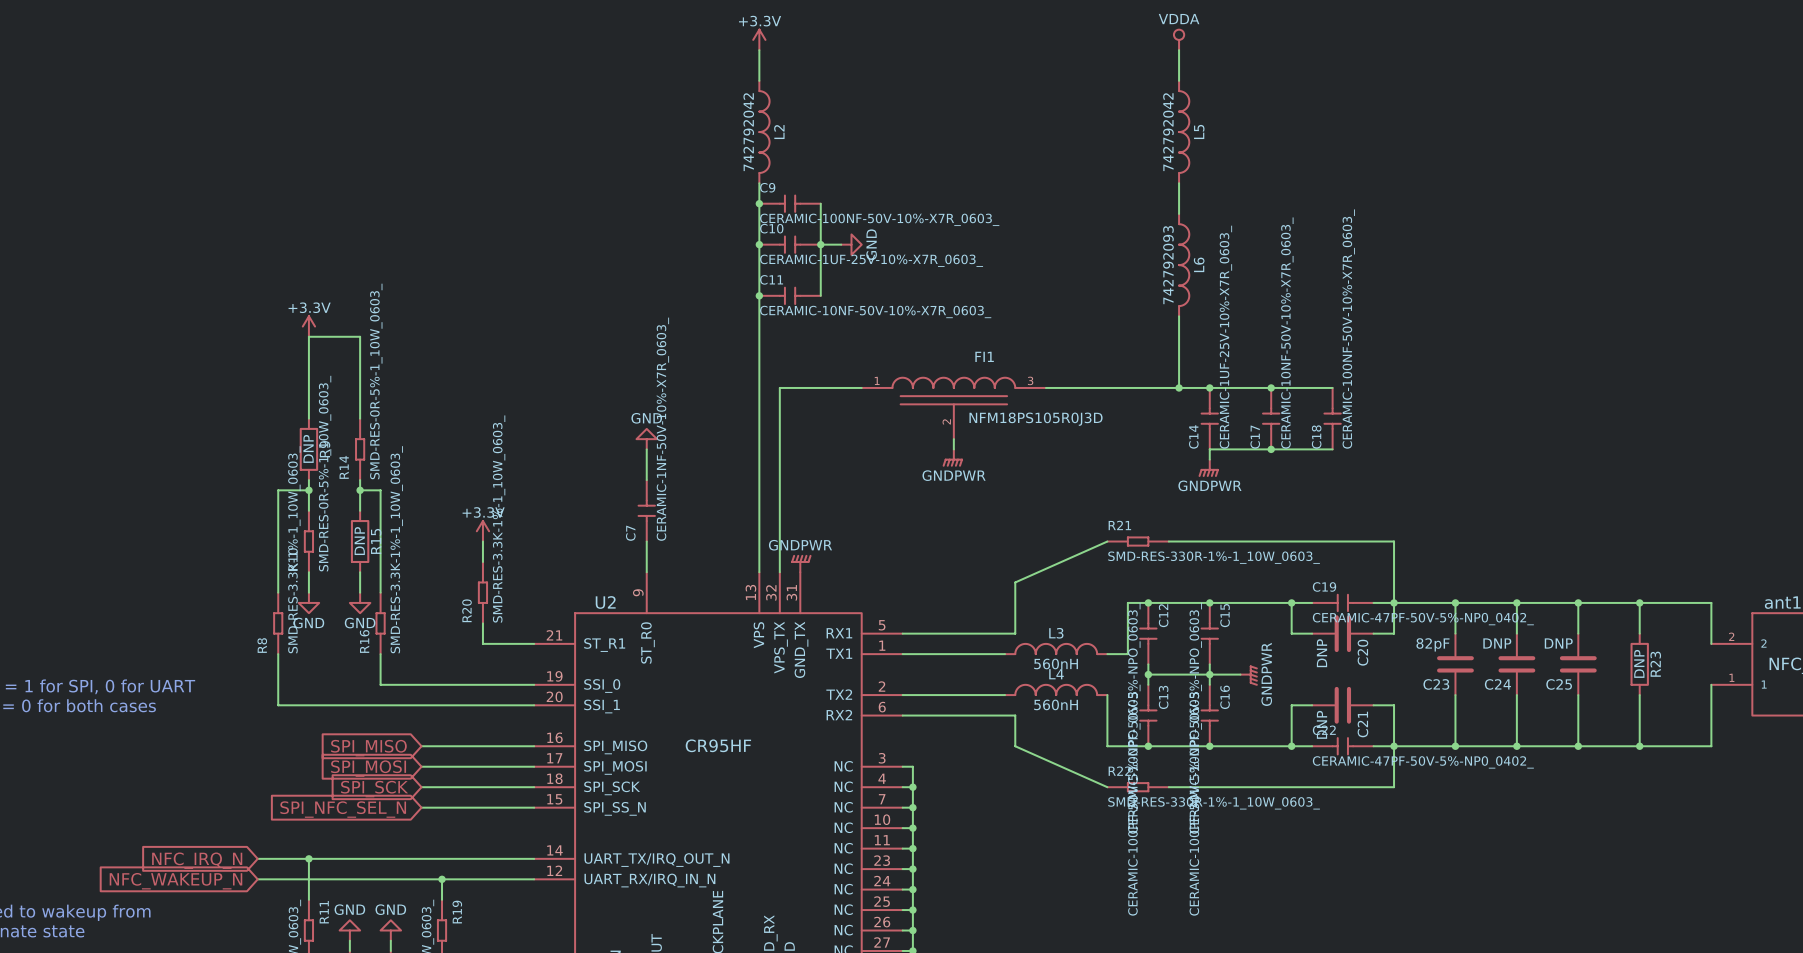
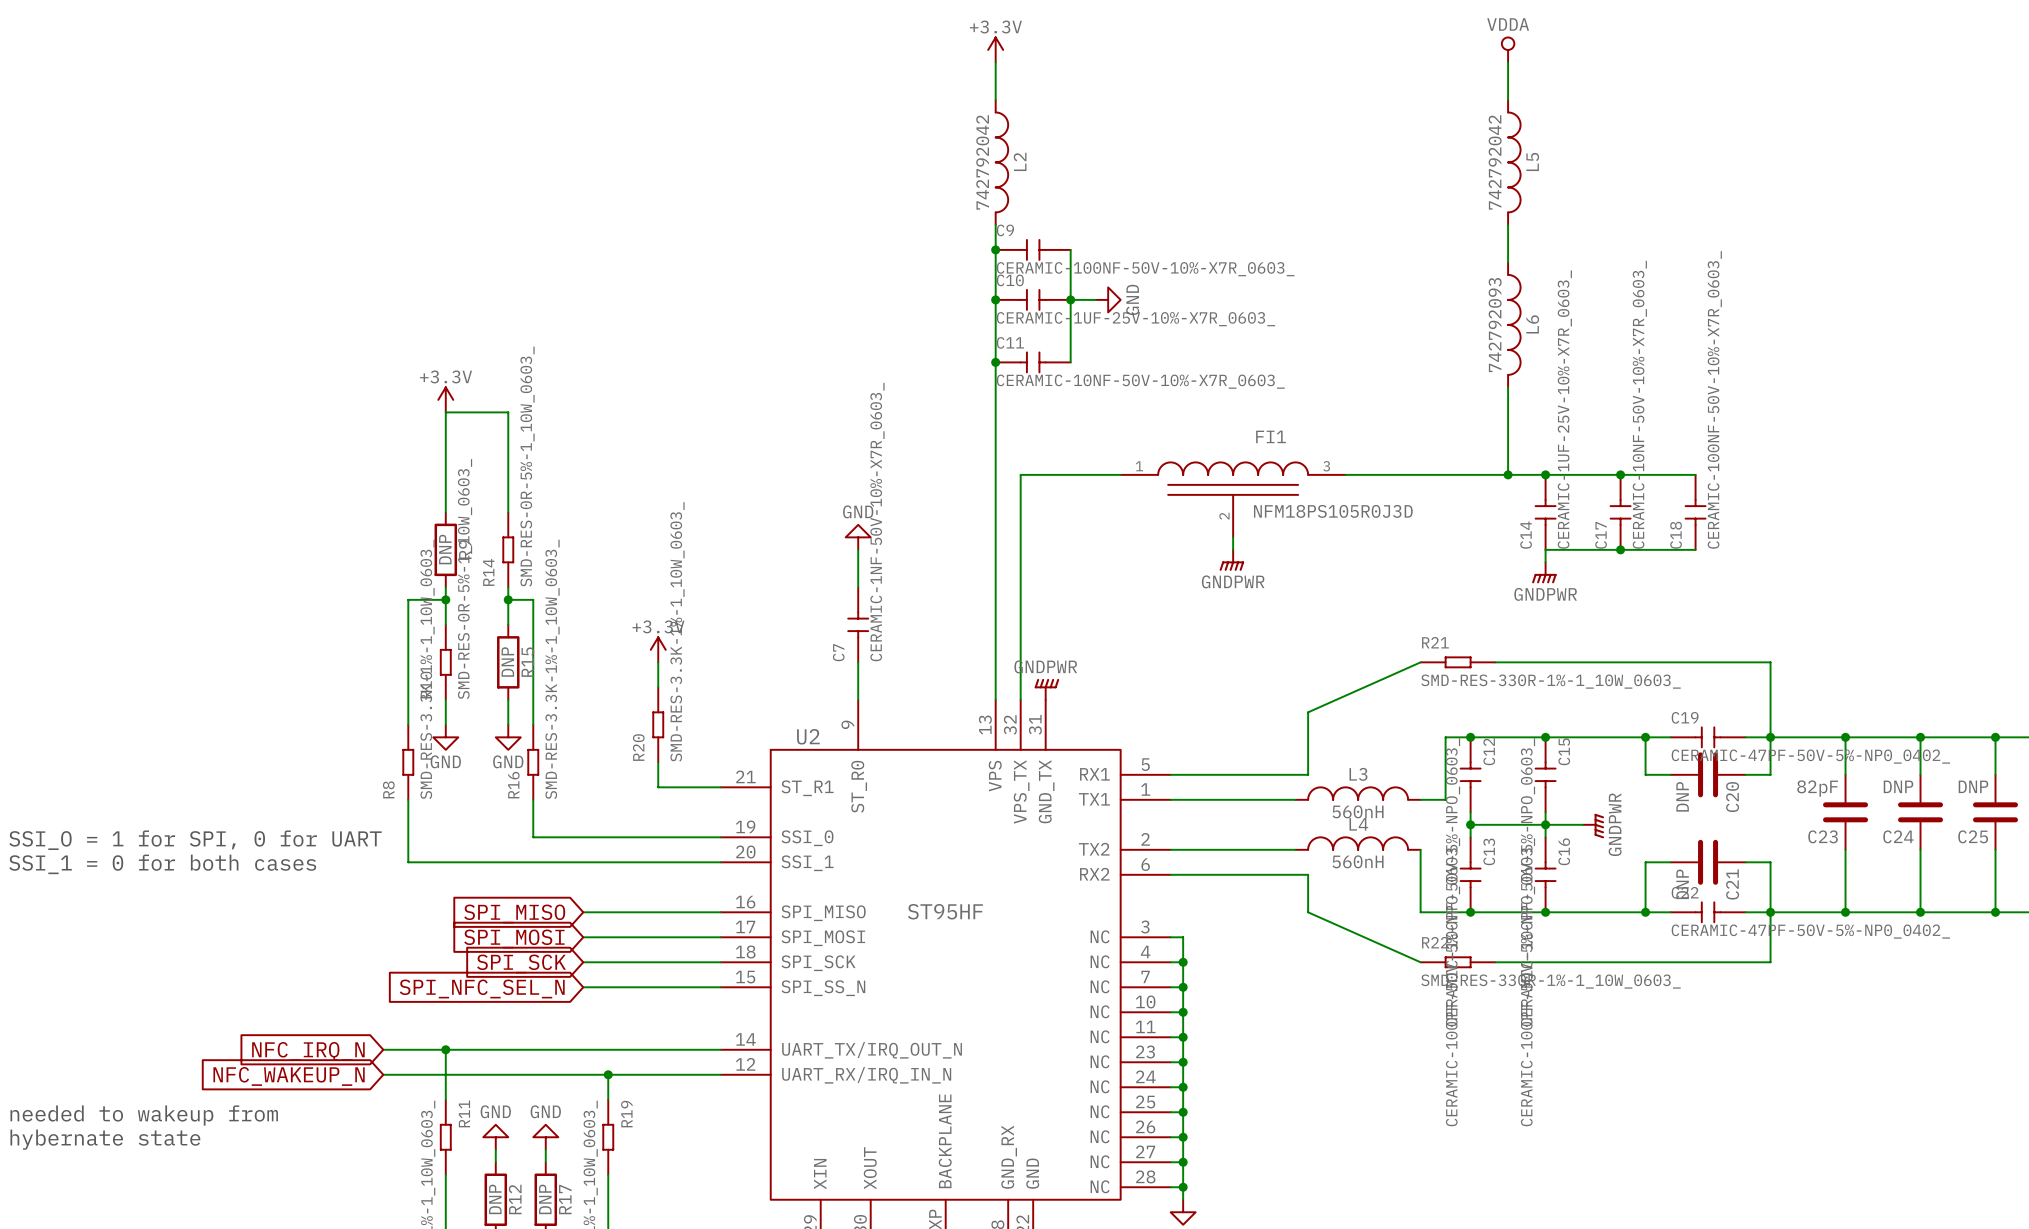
U2 value: CR95HF (718, 745) -> ST95HF (945, 911)

